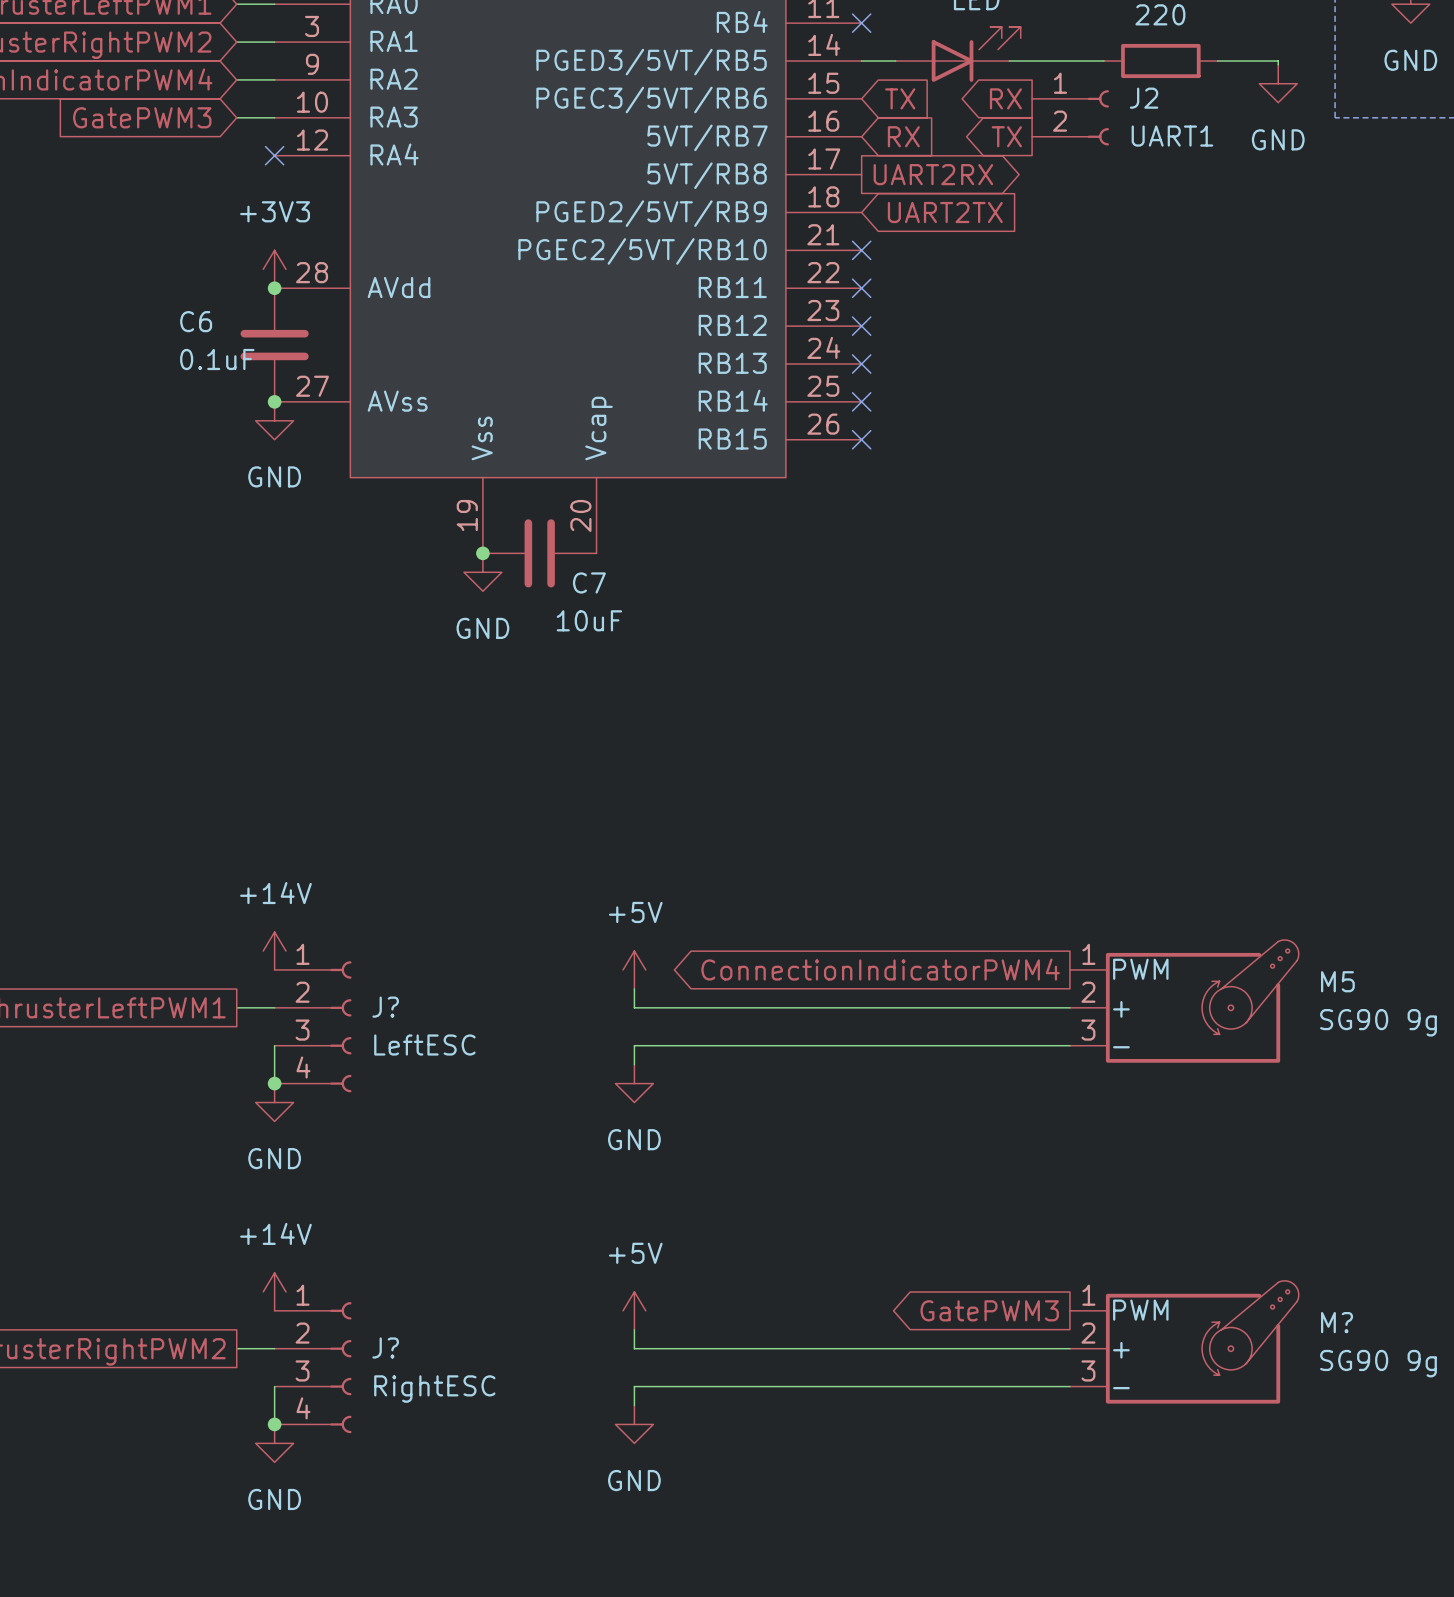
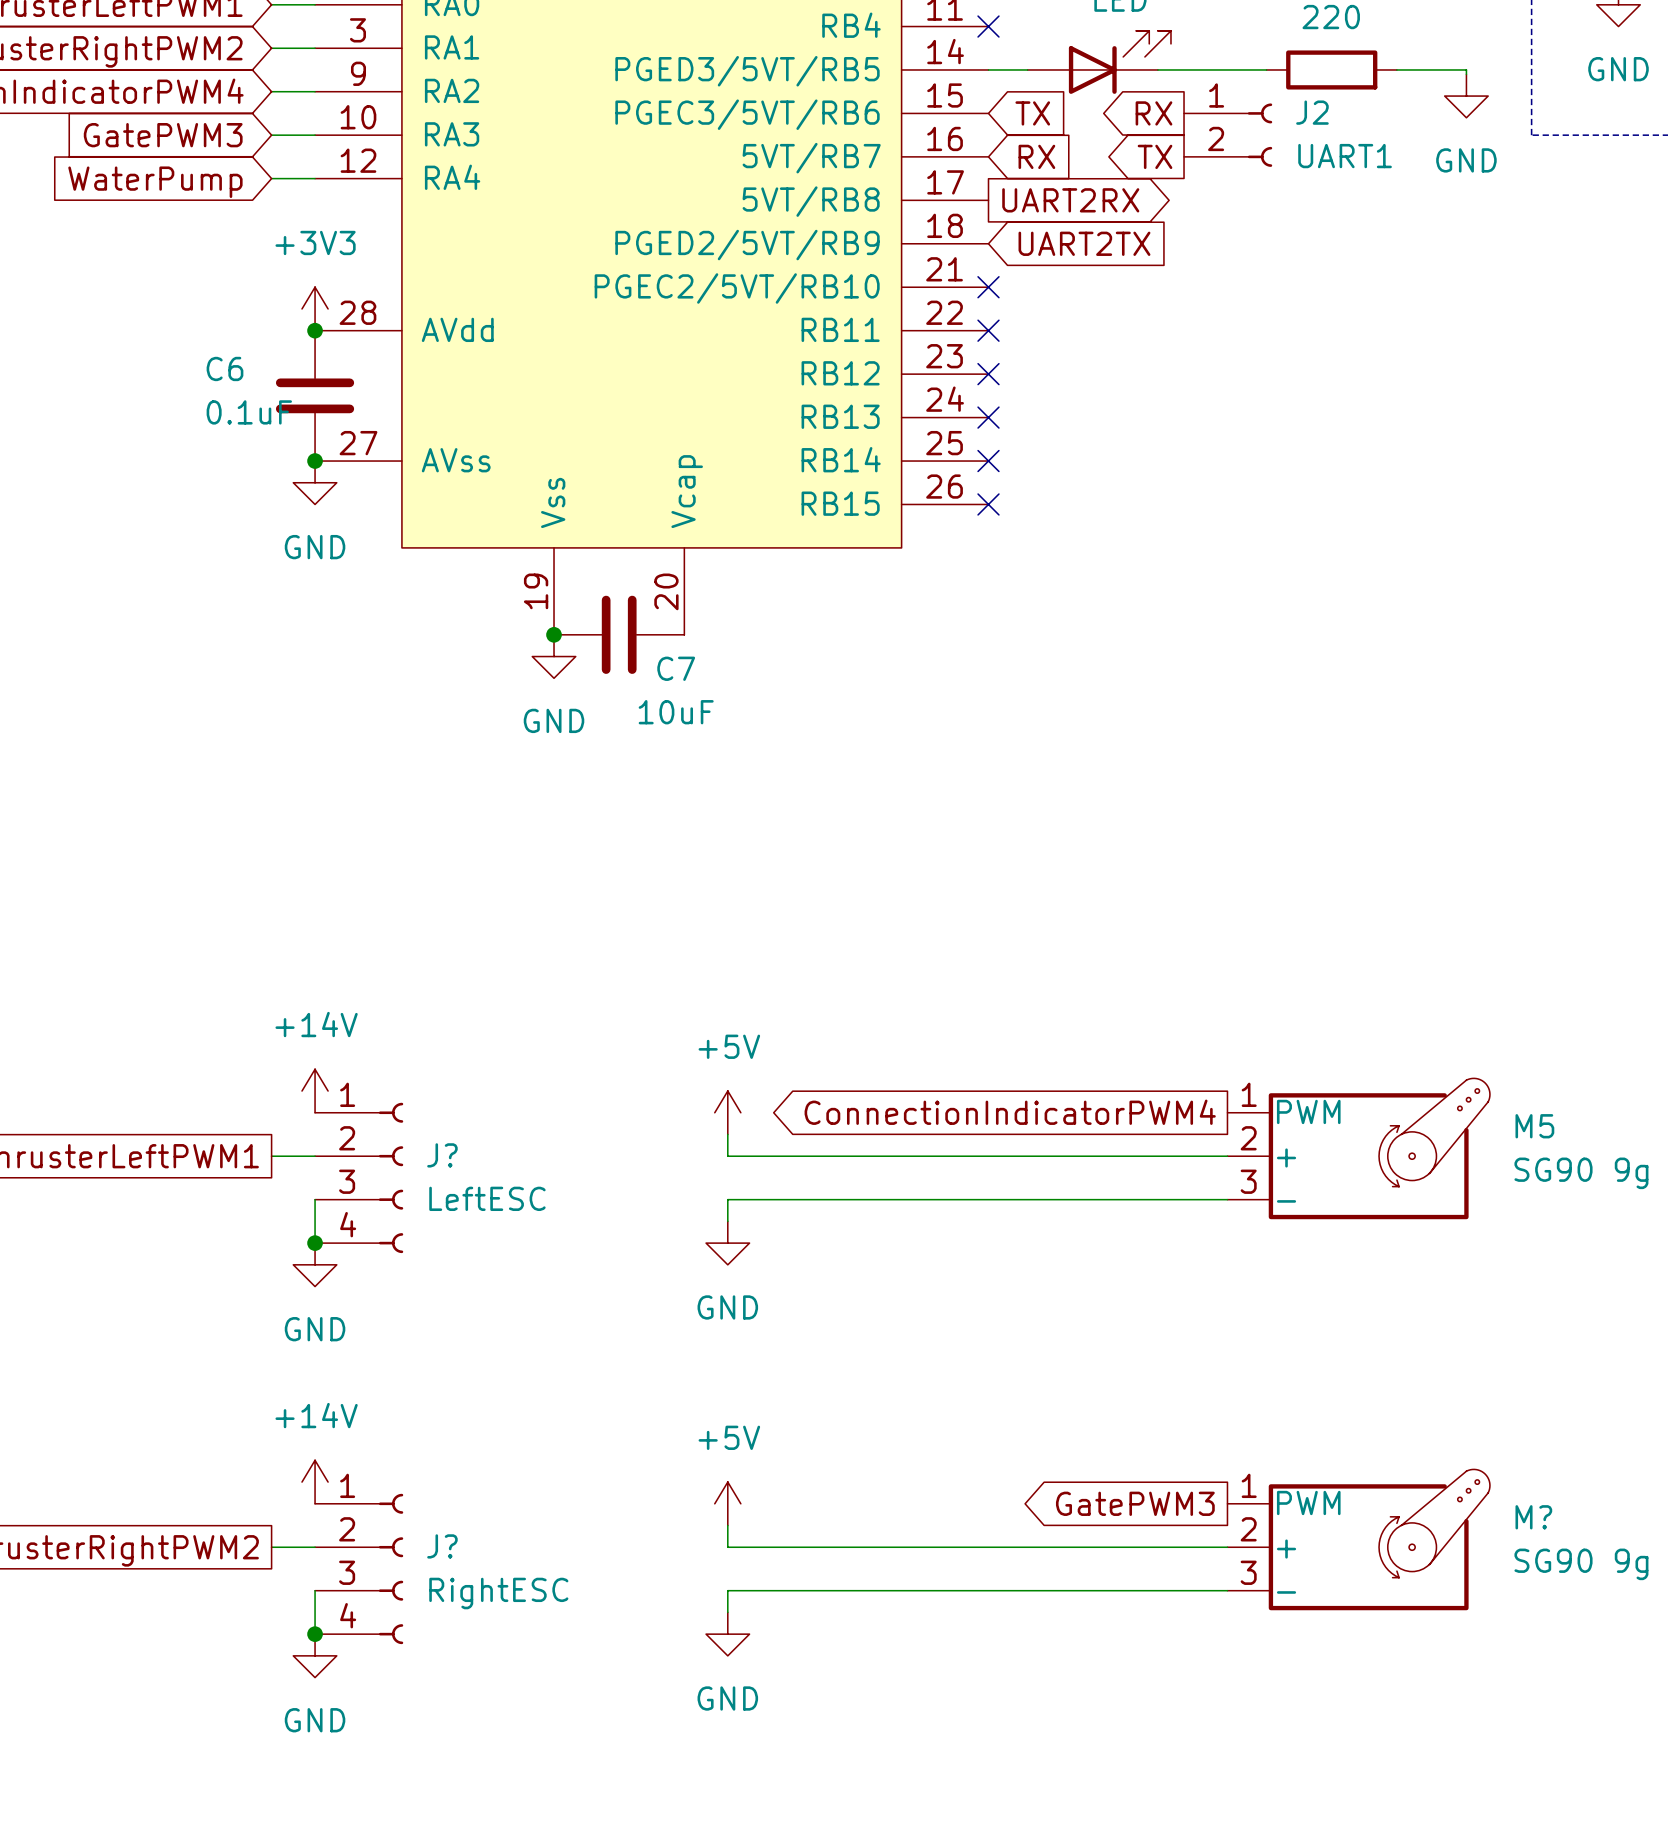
wire: none -> (271, 178) (315, 178)
no-connect mark: (274, 155) -> none
global label: none -> WaterPump (155, 182)

